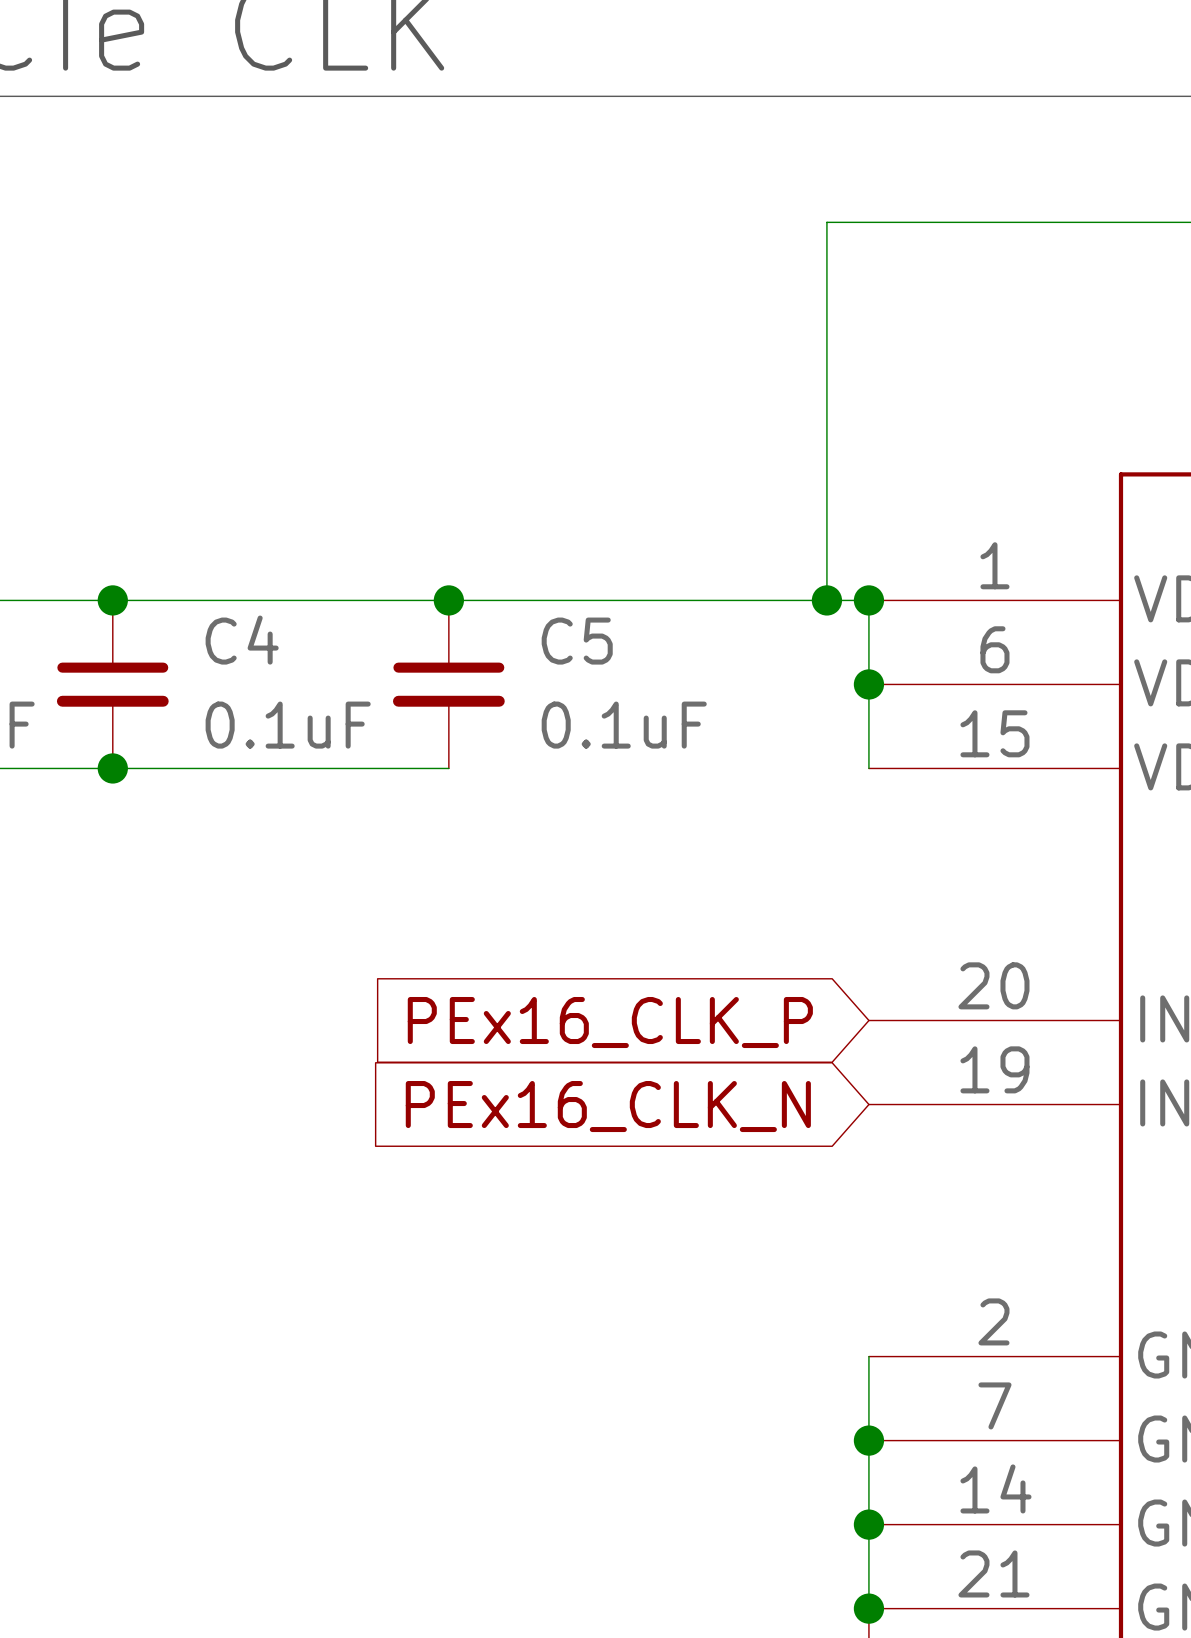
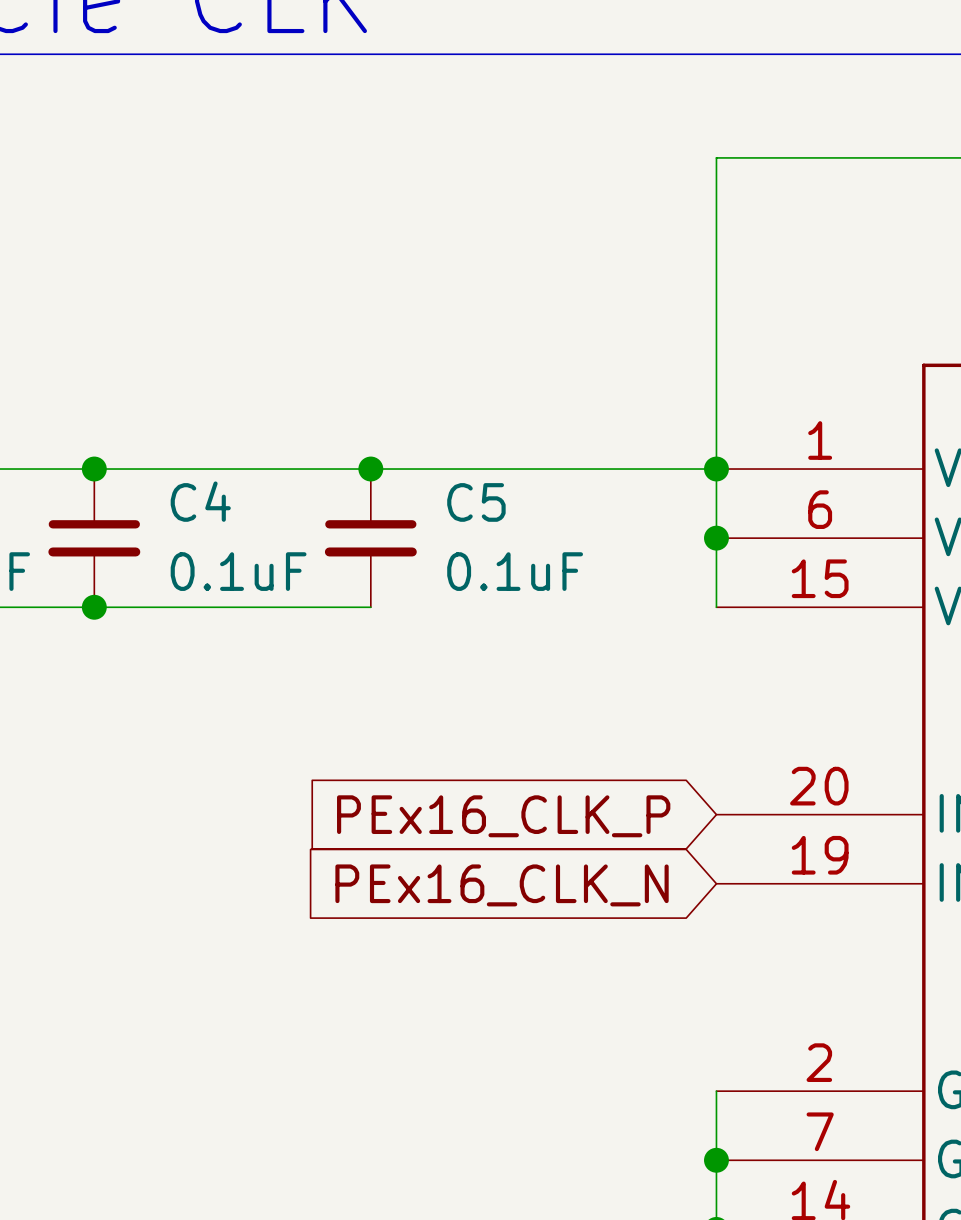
wire: (868, 222) (826, 222) (826, 600) -> (716, 157) (716, 469)
junction: (826, 600) -> none

